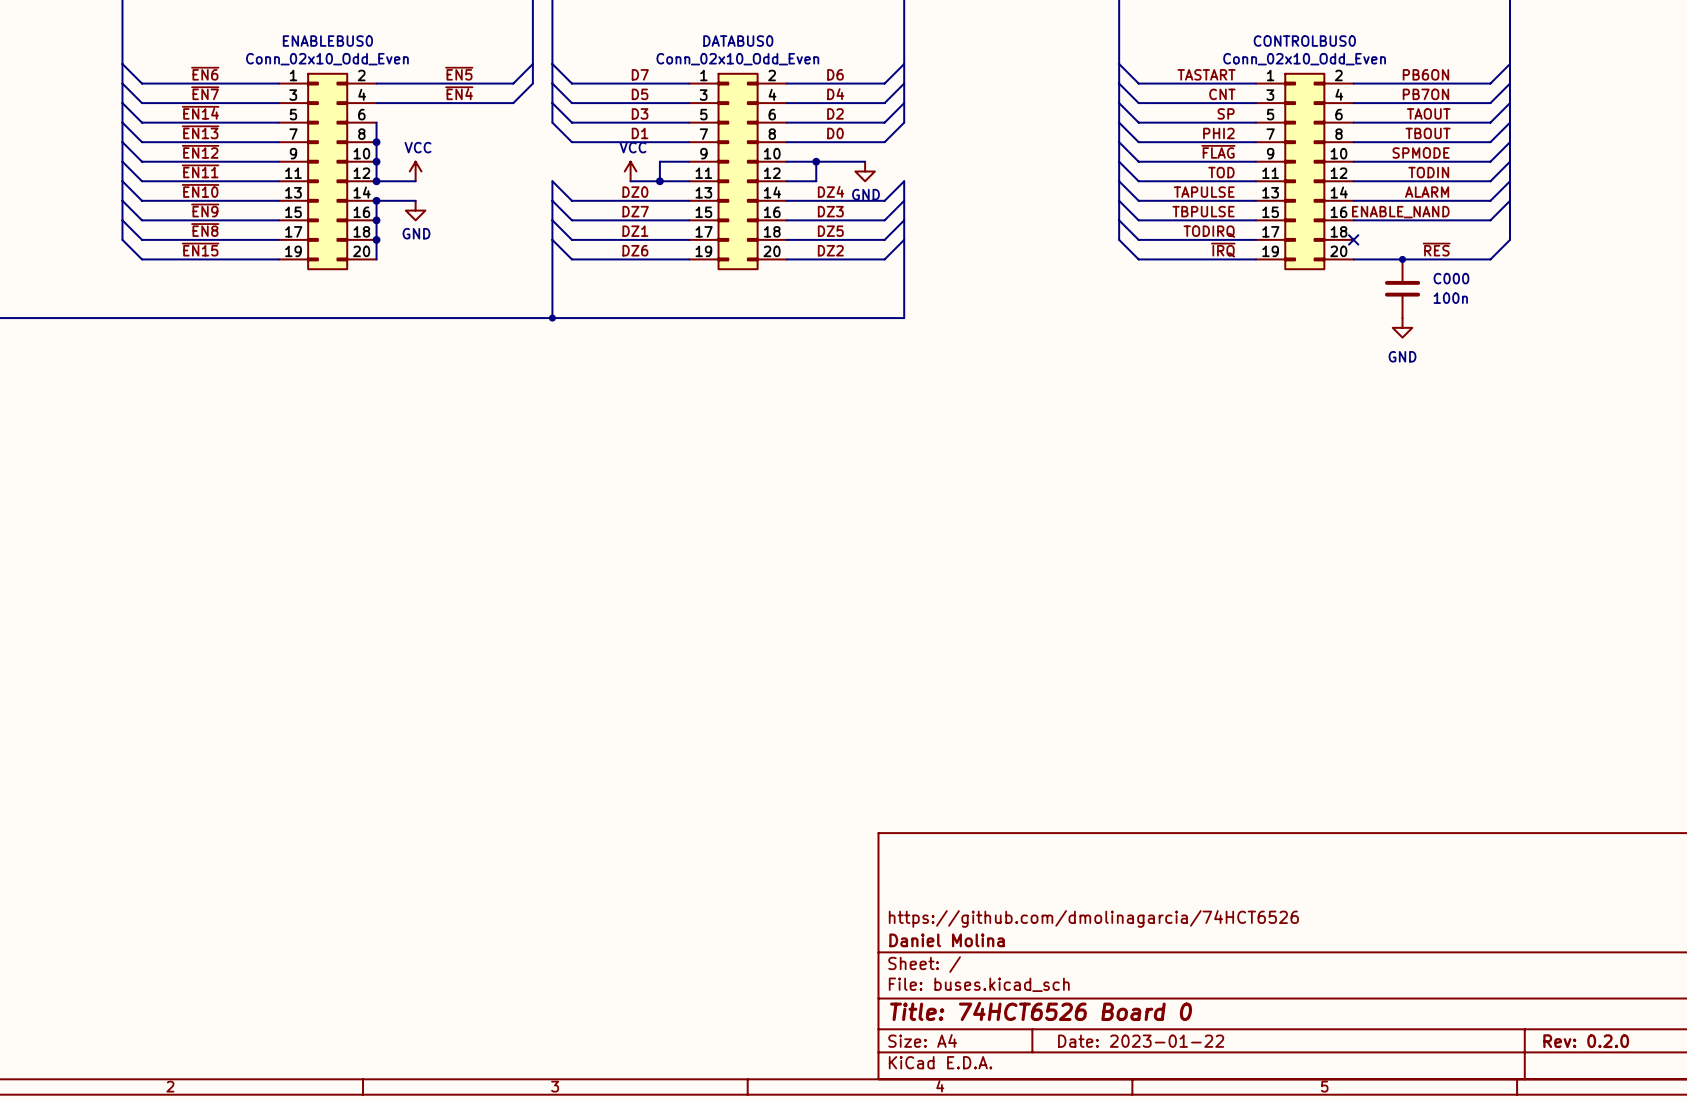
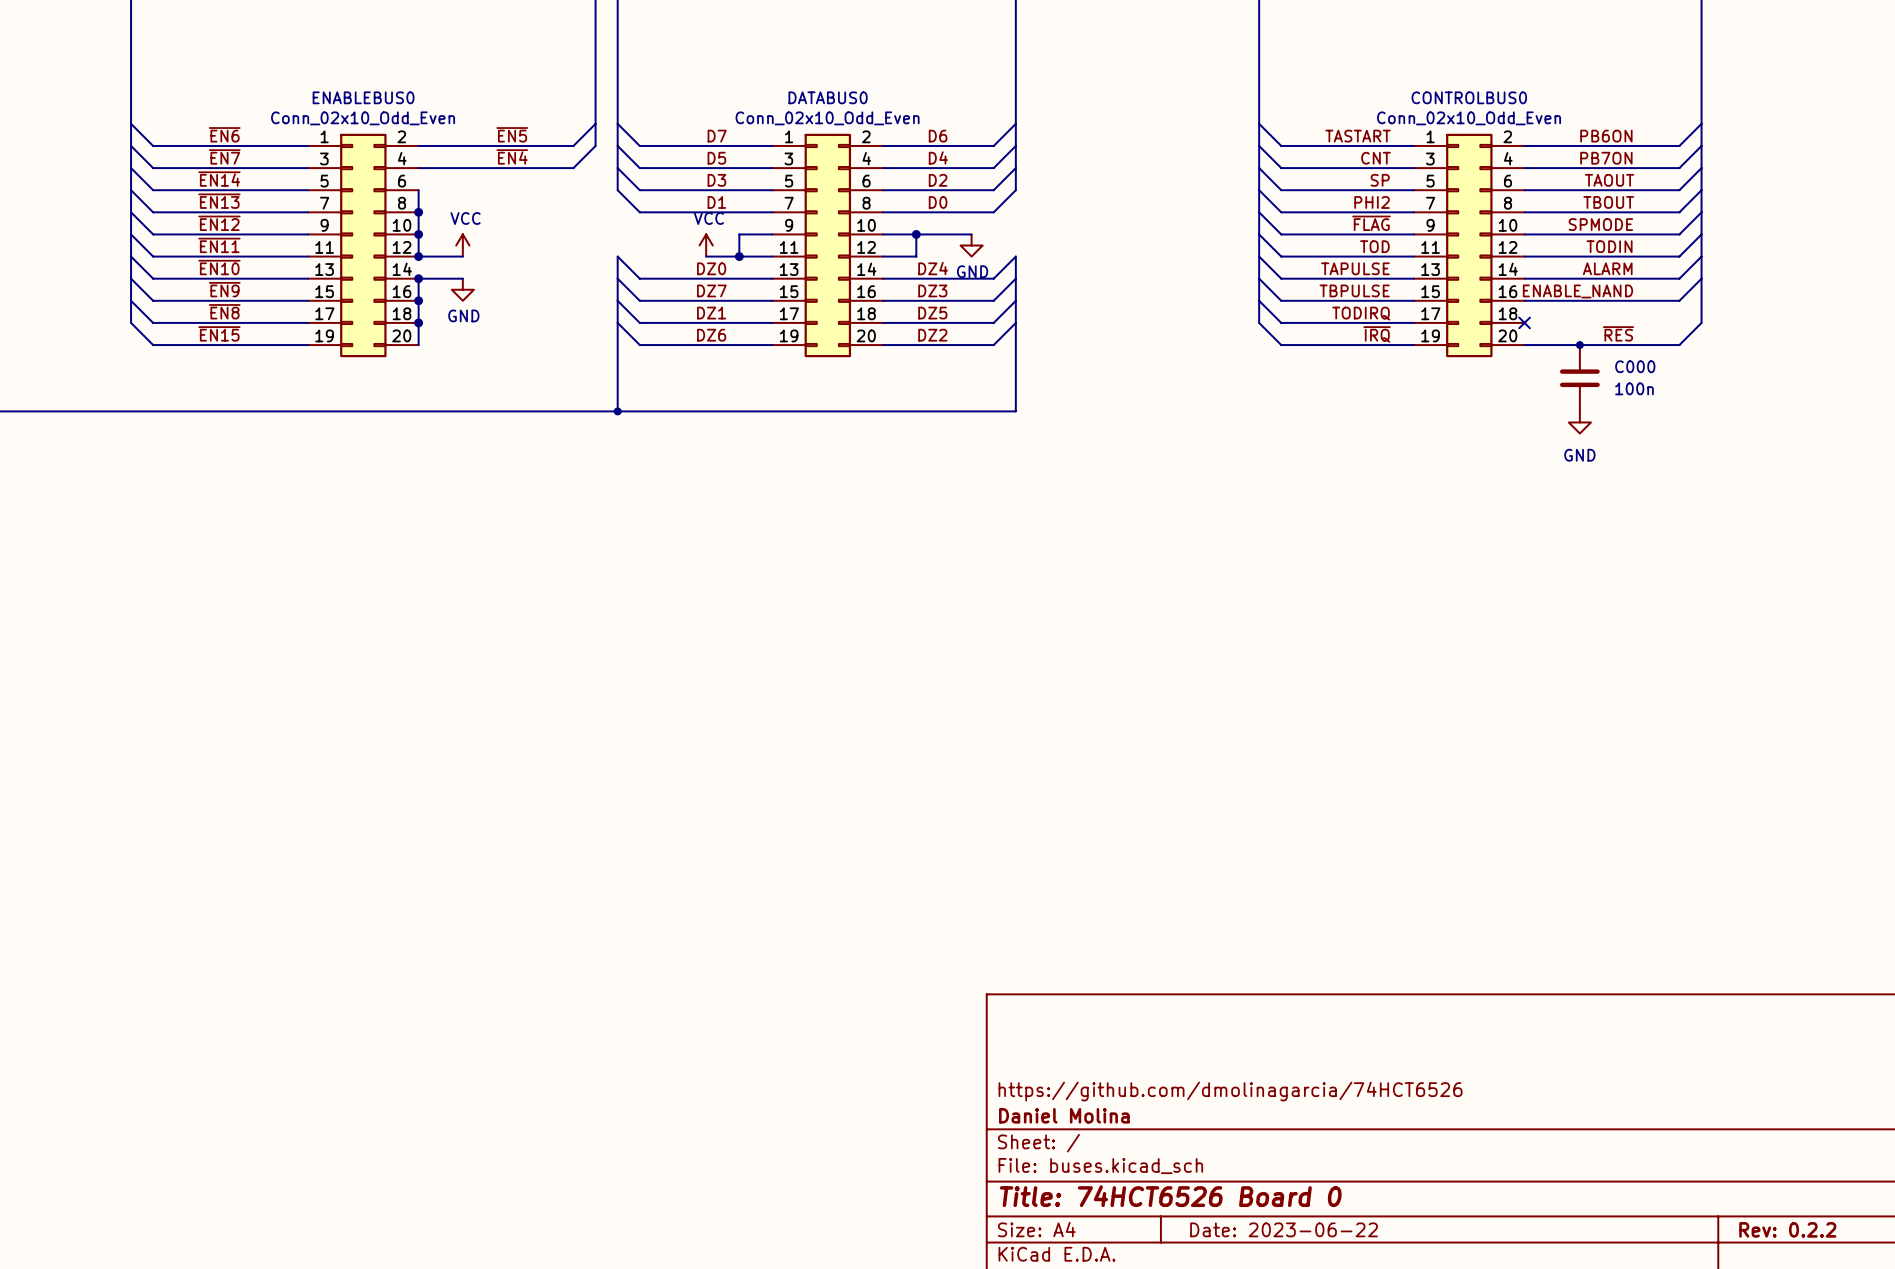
title block: Date: 2023-01-22 (1141, 1041) -> Date: 2023-06-22 (1284, 1229)
title block: Rev: 0.2.0 (1586, 1041) -> Rev: 0.2.2 (1787, 1229)

